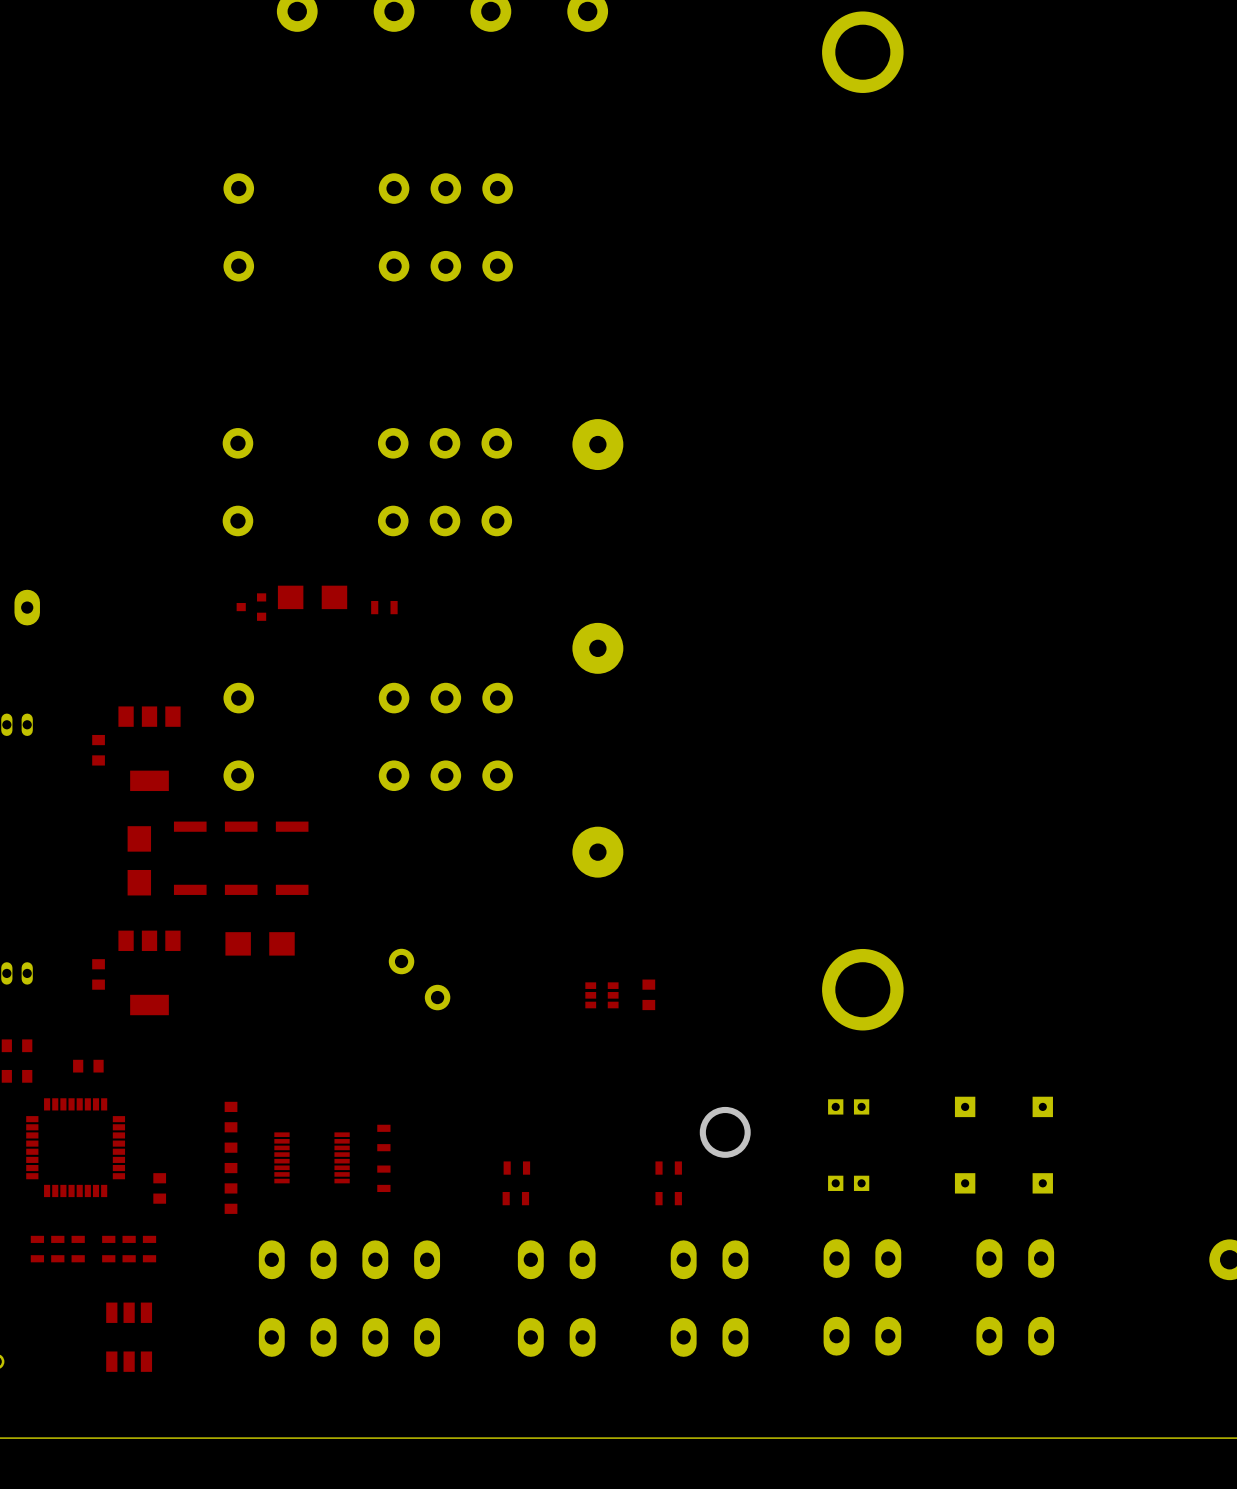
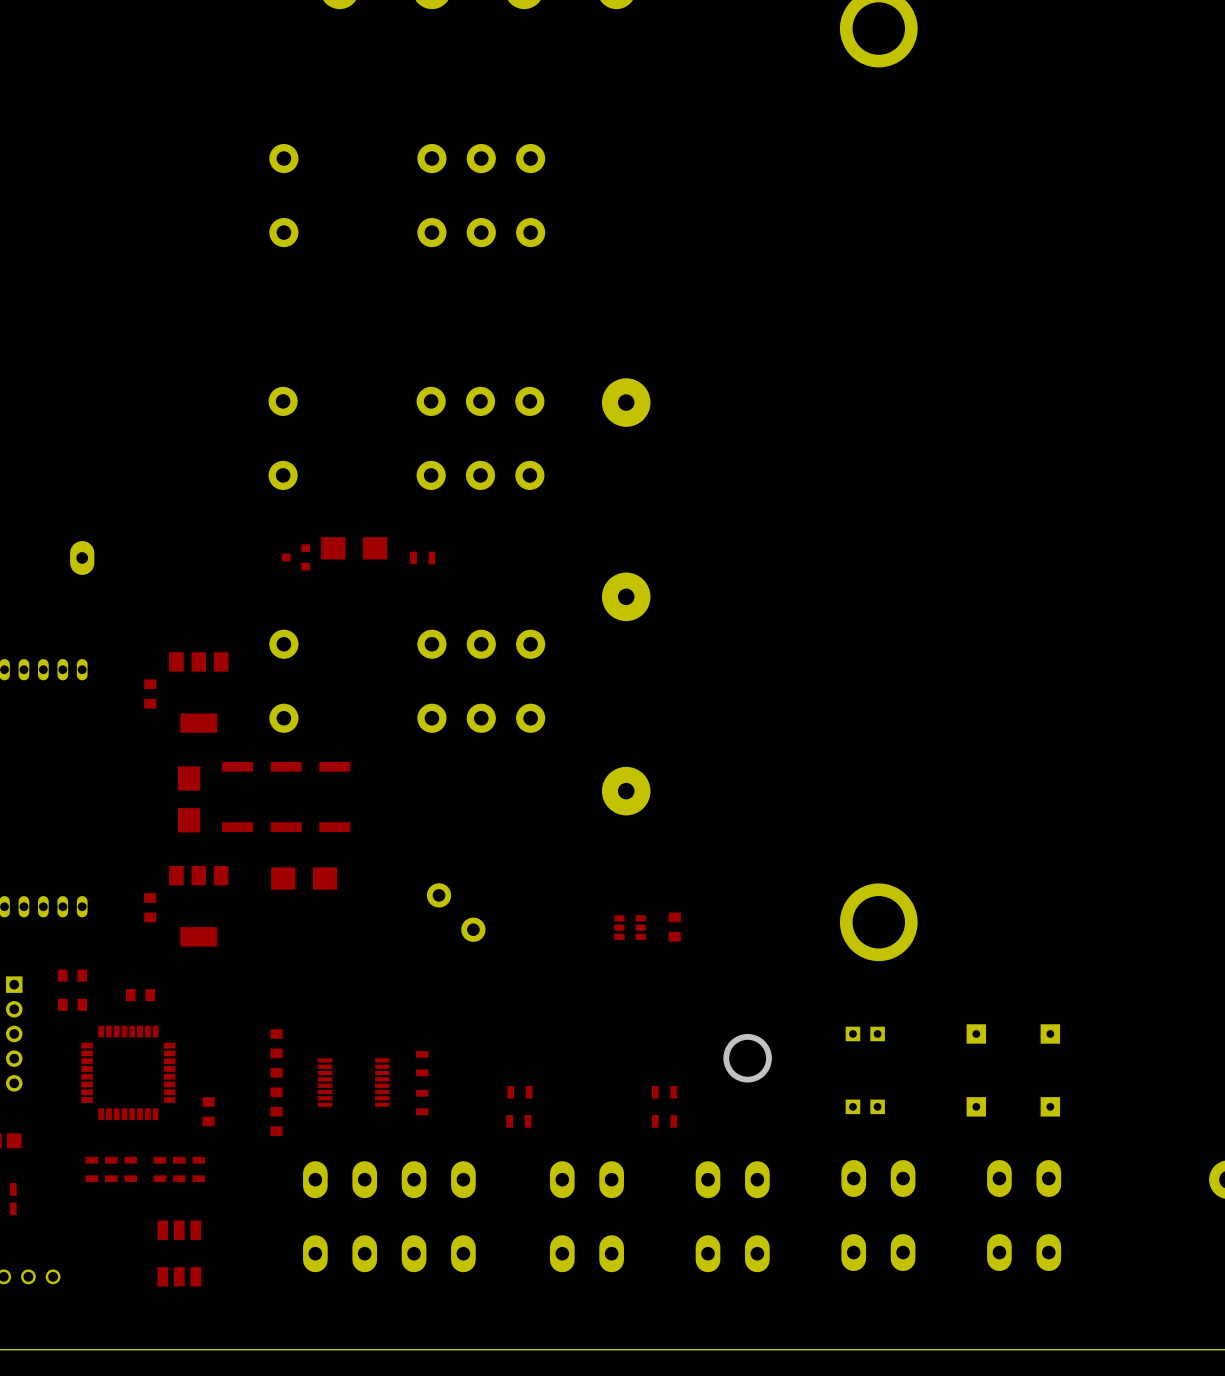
part: none -> (519, 1092)
part: (516, 1168) -> none
part: none -> (664, 1092)
part: (668, 1168) -> none
part: none -> (518, 1121)
part: (515, 1198) -> none
part: none -> (664, 1121)
part: (668, 1198) -> none

